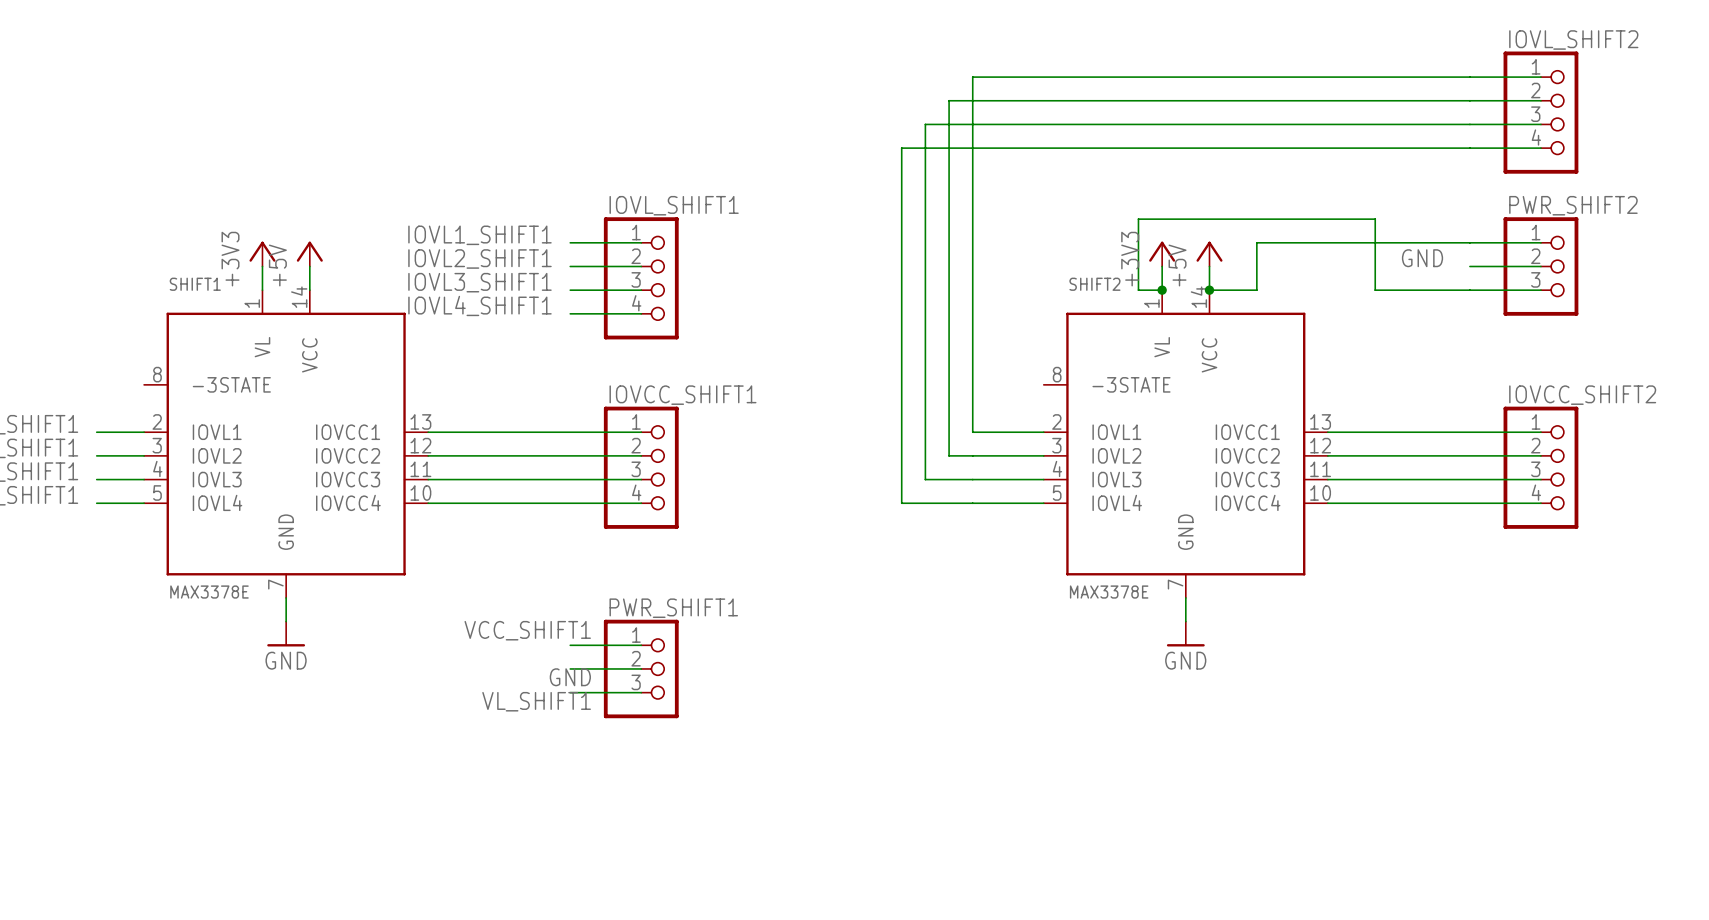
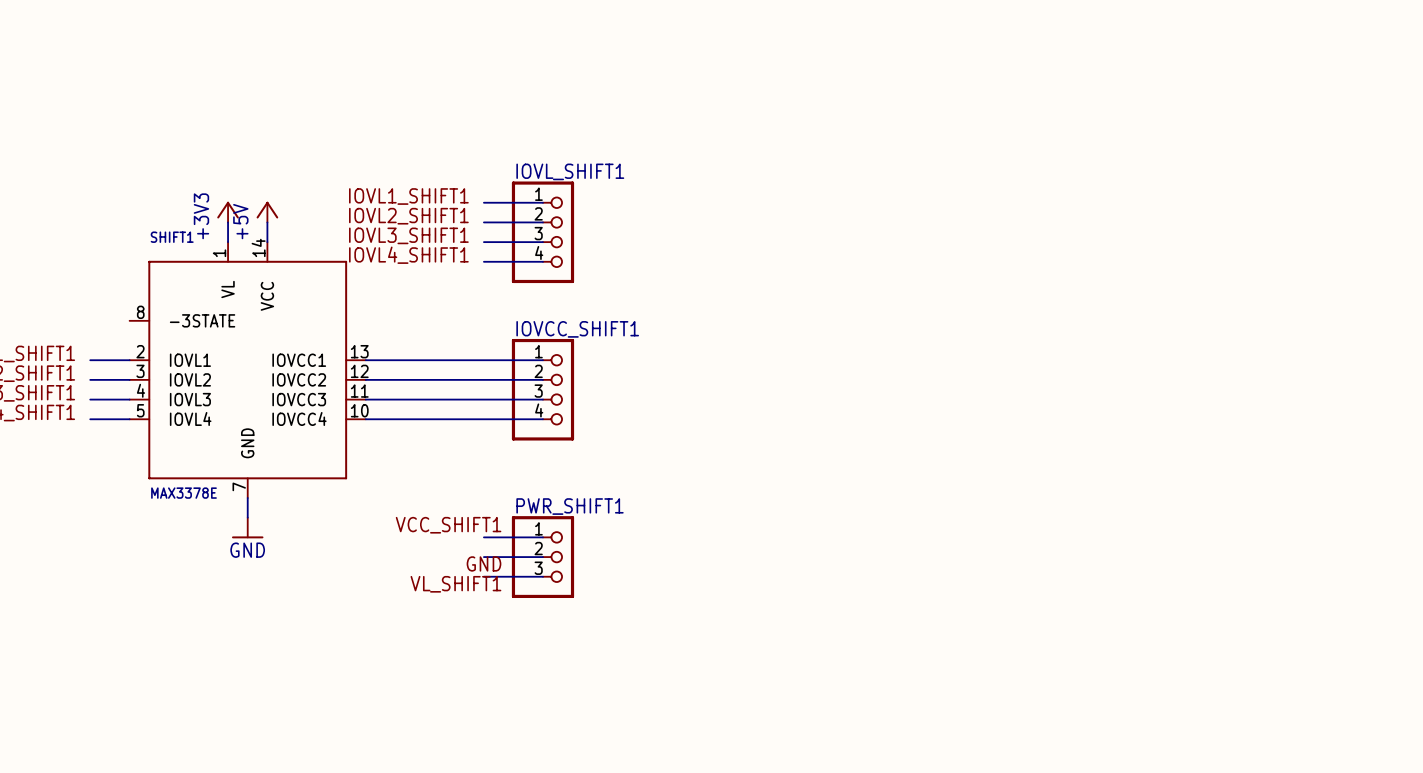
wire: (1540, 77) (972, 77) (972, 432) (1043, 432) -> none
wire: (1540, 100) (949, 100) (949, 455) (1043, 455) -> none
IOVL_SHIFT2: (1540, 112) -> none
wire: (1540, 124) (925, 124) (925, 479) (1043, 479) -> none
wire: (1540, 148) (901, 148) (901, 503) (1043, 503) -> none
wire: (1540, 242) (1256, 242) (1256, 290) (1209, 290) (1209, 266) -> none
power symbol: +3V3 (1162, 254) -> none
power symbol: +5V (1209, 254) -> none
label: GND (1422, 258) -> none
wire: (1162, 266) (1162, 290) (1138, 290) (1138, 219) (1375, 219) (1375, 290) (1540, 290) -> none
wire: (1469, 266) (1540, 266) -> none
PWR_SHIFT2: (1540, 266) -> none
junction: (1162, 290) -> none
junction: (1209, 290) -> none
wire: (1327, 432) (1540, 432) -> none
SHIFT2: MAX3378E (1185, 444) -> none
wire: (1327, 455) (1540, 455) -> none
IOVCC_SHIFT2: (1540, 467) -> none
wire: (1327, 479) (1540, 479) -> none
wire: (1327, 503) (1540, 503) -> none
wire: (1185, 597) (1185, 621) -> none
power symbol: GND (1185, 634) -> none

